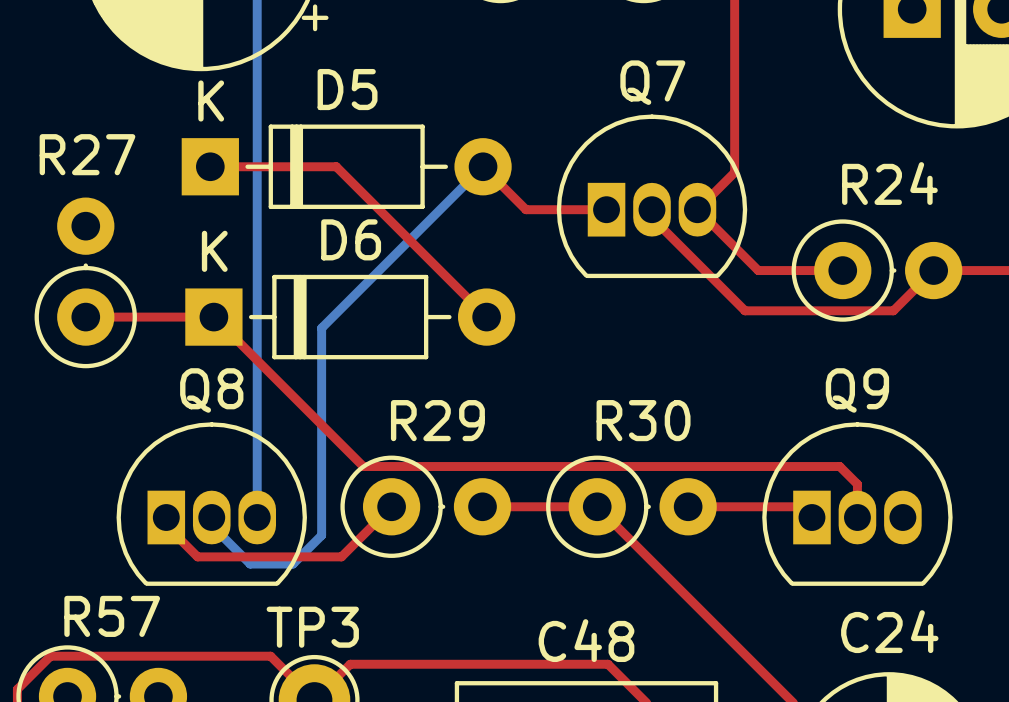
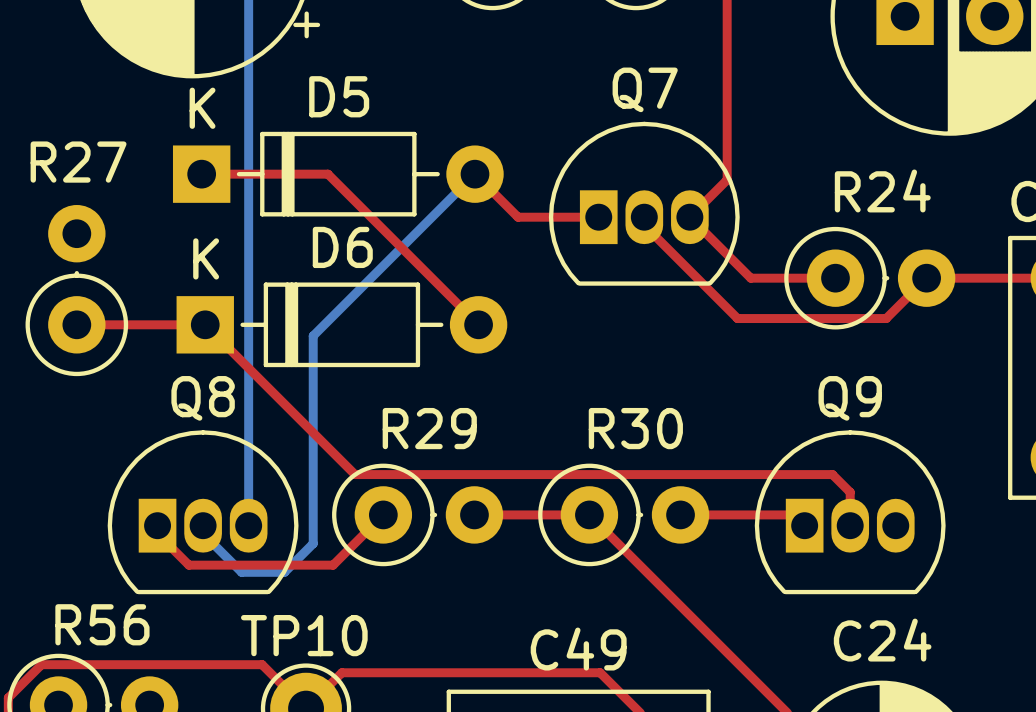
R57 name: R57 (112, 616) -> R56 (102, 624)
TP3 name: TP3 (312, 627) -> TP10 (304, 635)
C48 name: C48 (586, 640) -> C49 (578, 649)

